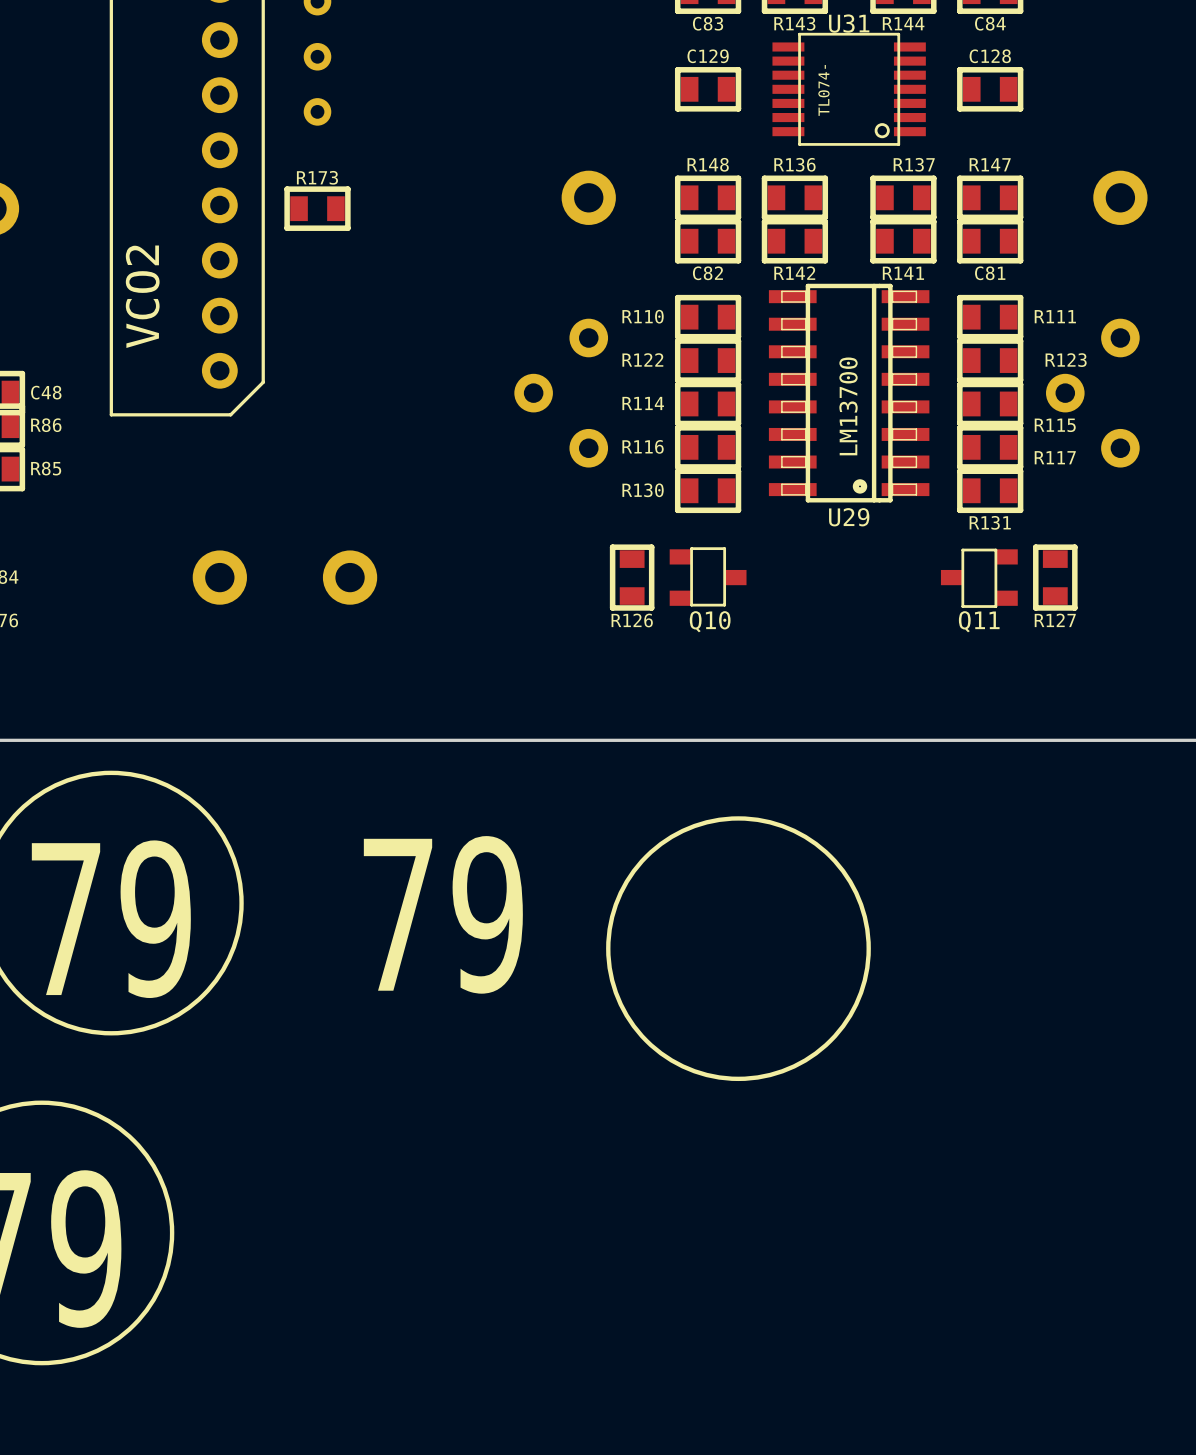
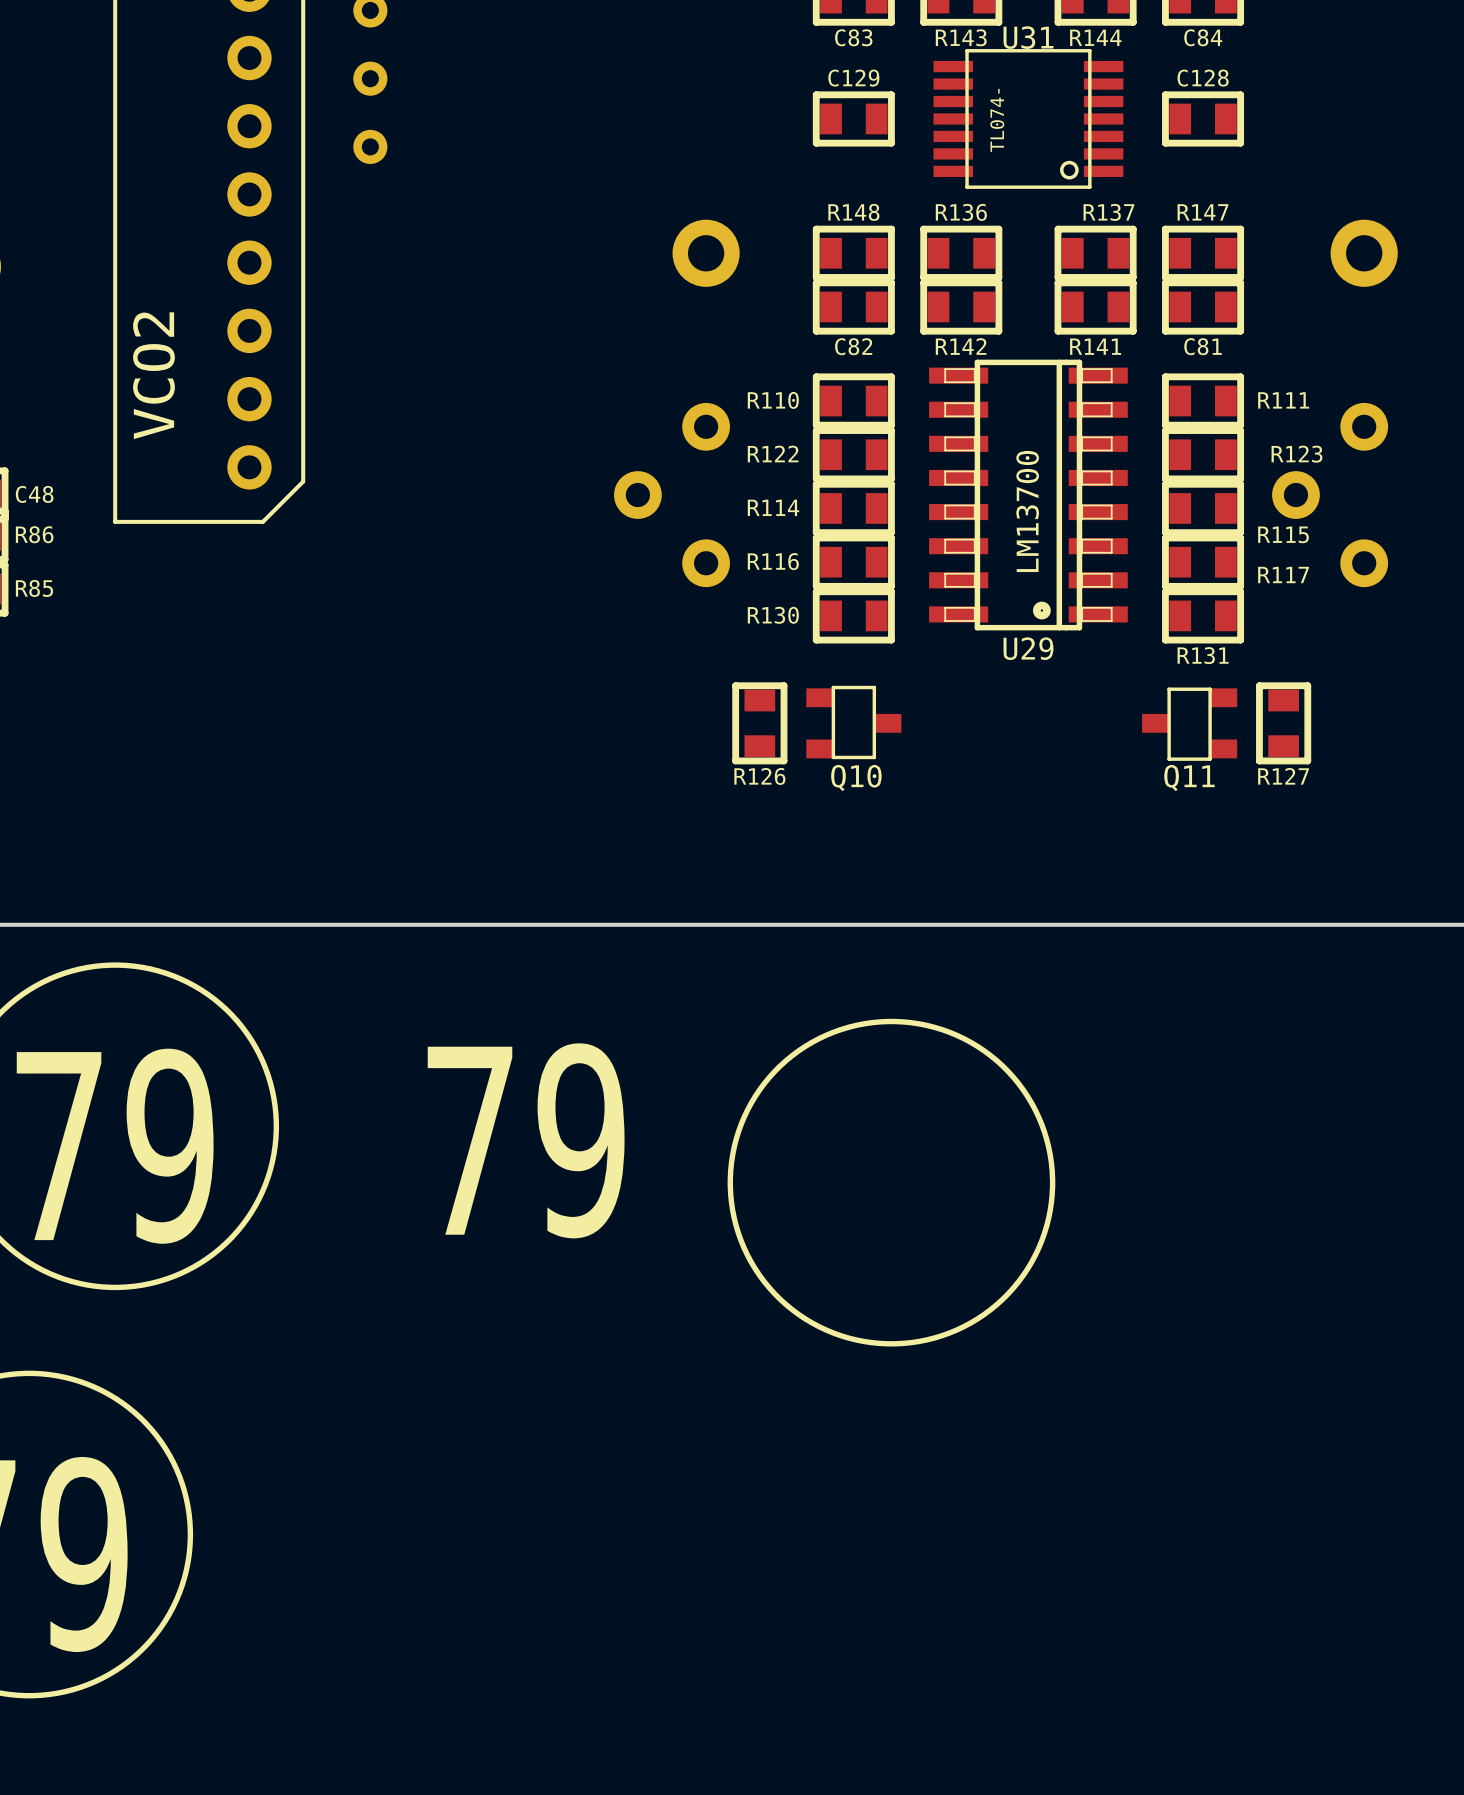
R173: (317, 208) -> none
part: (219, 577) -> none
part: (350, 577) -> none

